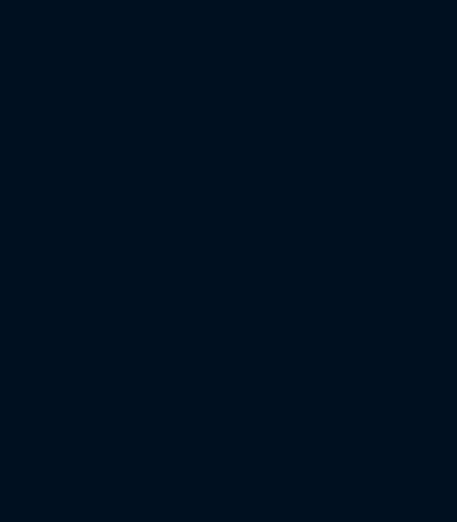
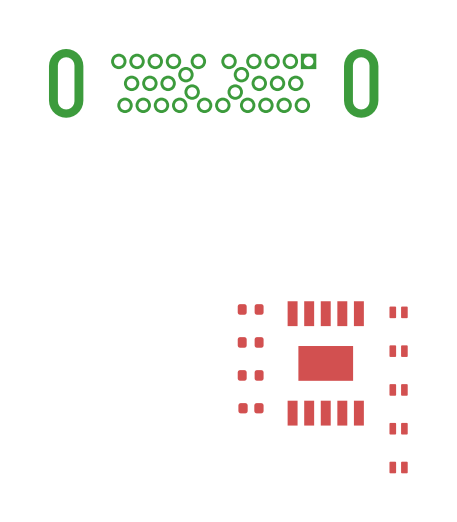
part: none -> (213, 83)
part: none -> (250, 309)
part: none -> (398, 312)
part: none -> (250, 342)
part: none -> (398, 351)
part: none -> (325, 363)
part: none -> (250, 375)
part: none -> (398, 389)
part: none -> (250, 408)
part: none -> (398, 428)
part: none -> (398, 467)

